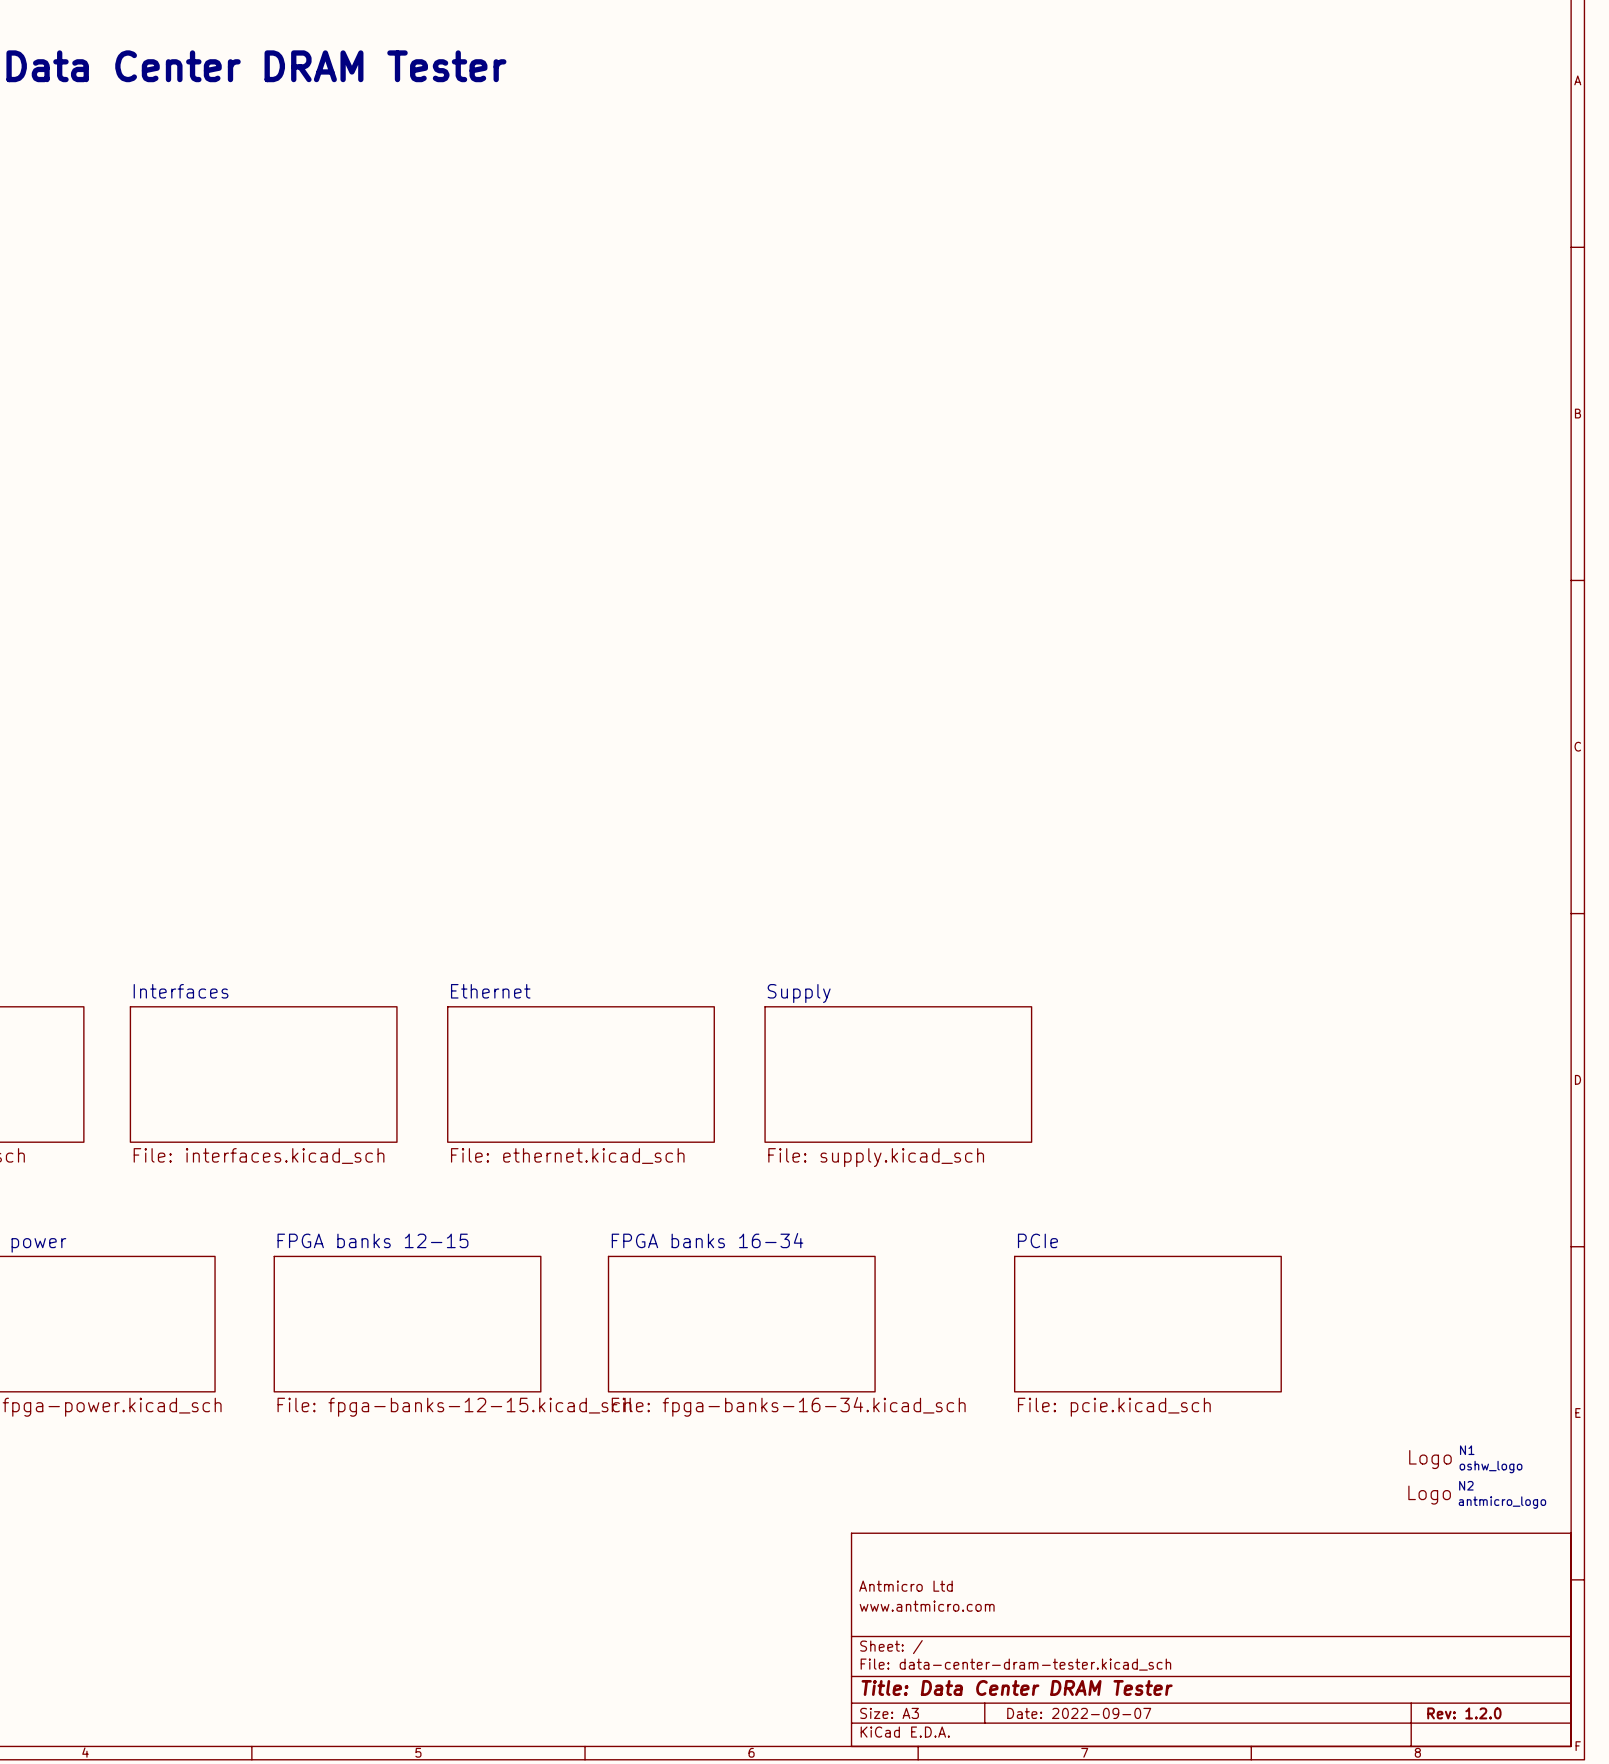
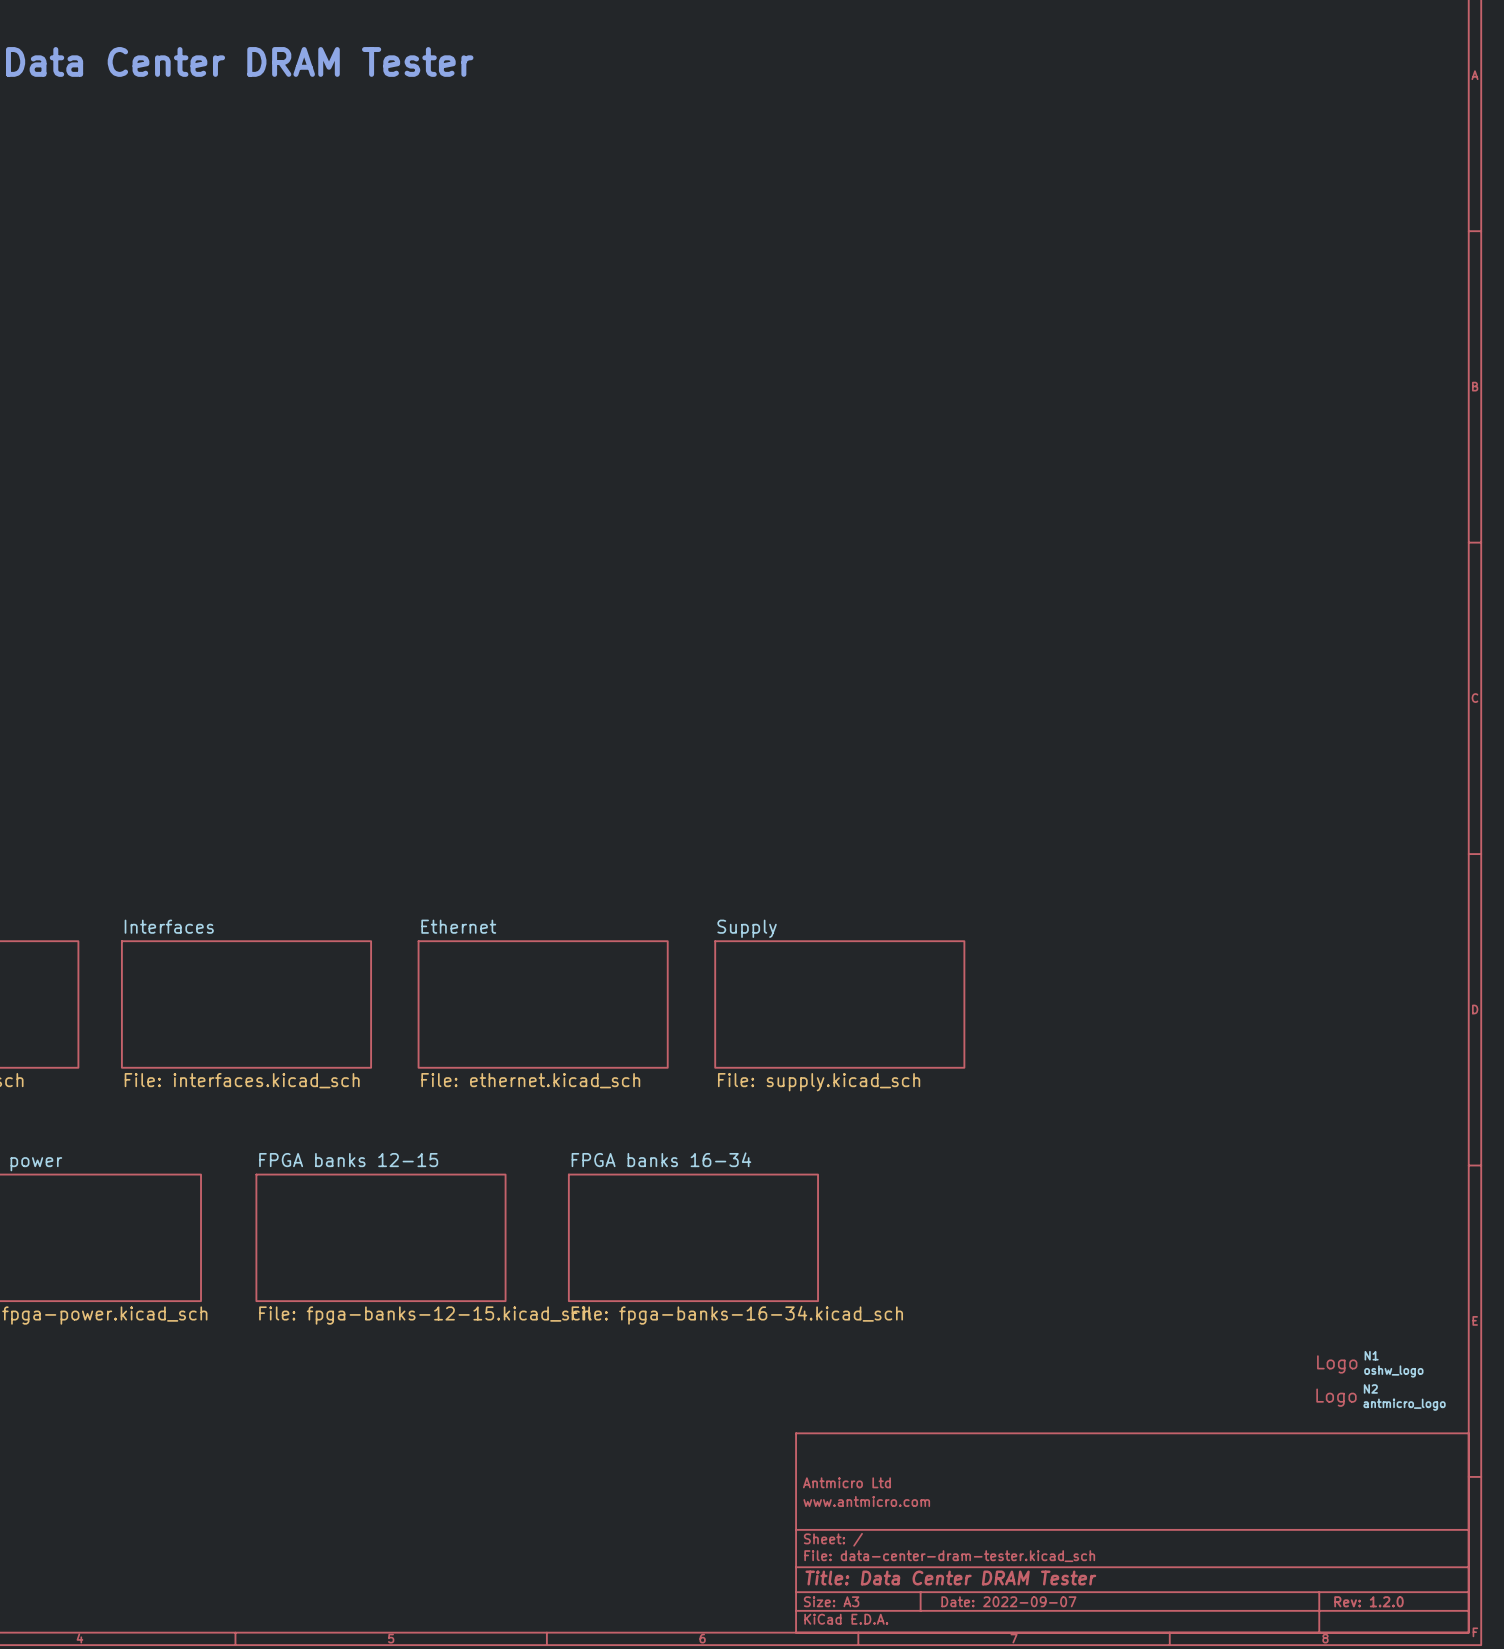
sheet PCIe: File: pcie.kicad_sch (1147, 1324) -> none

